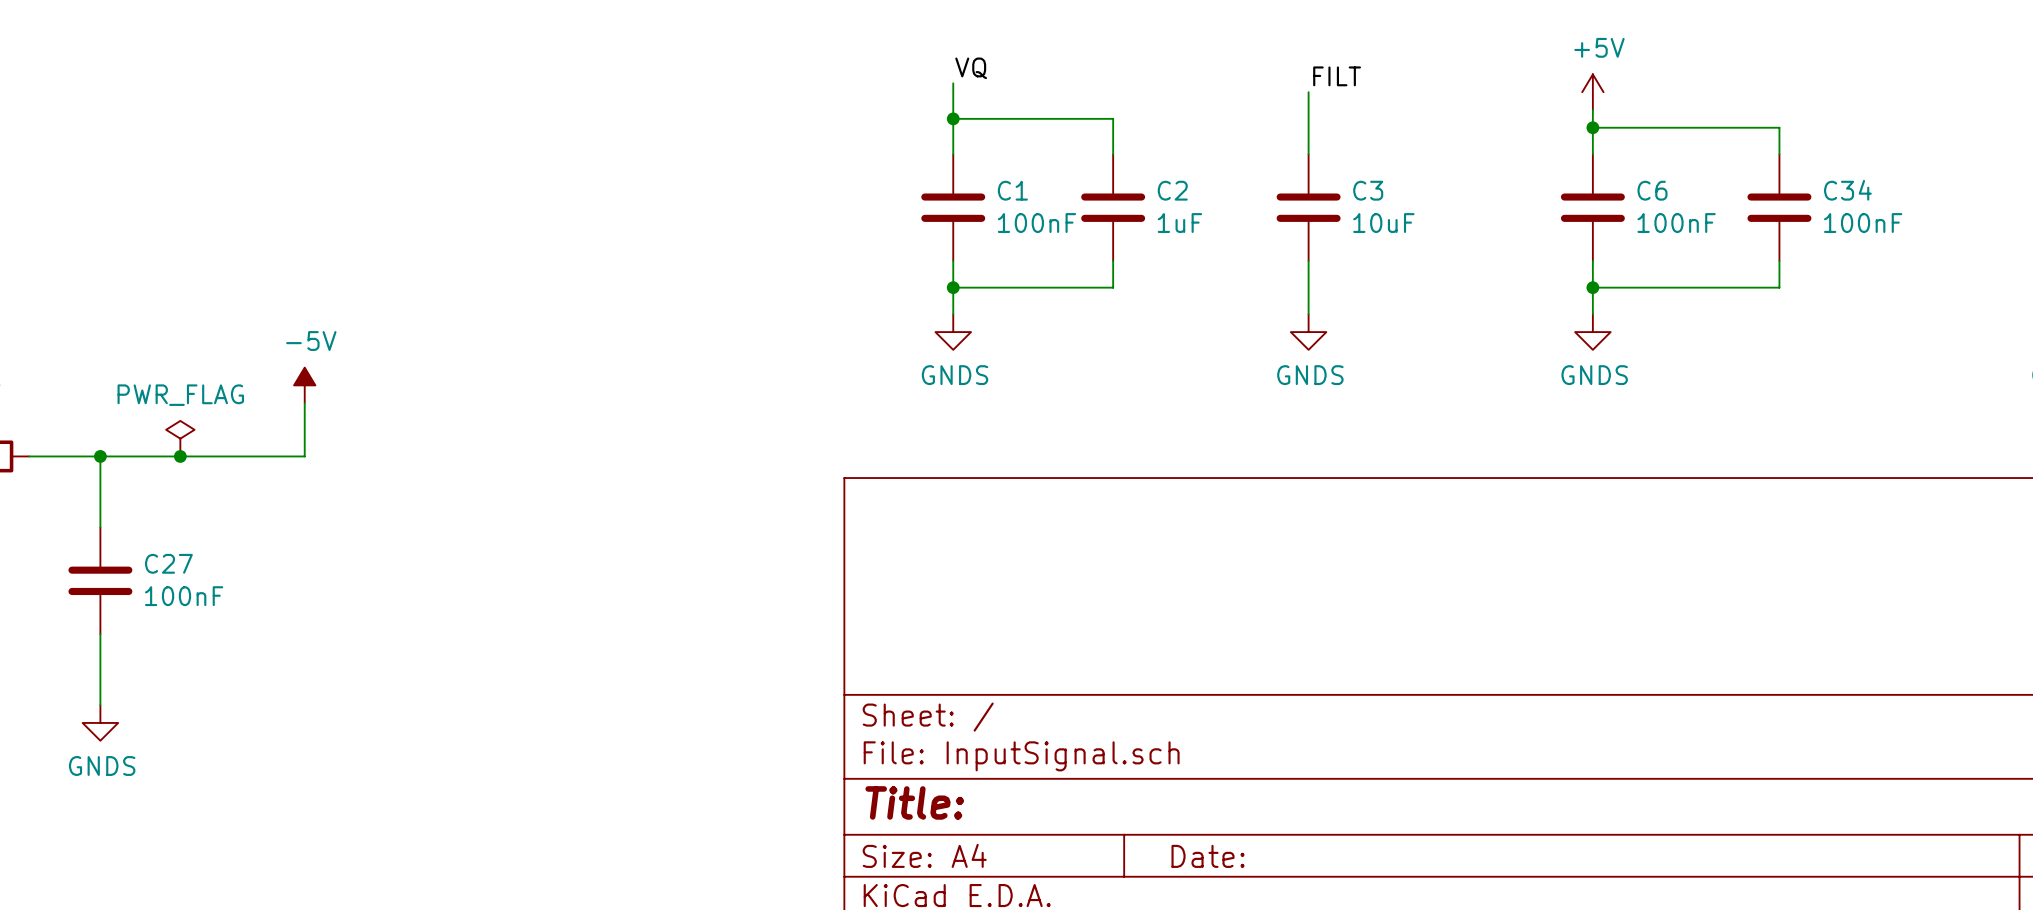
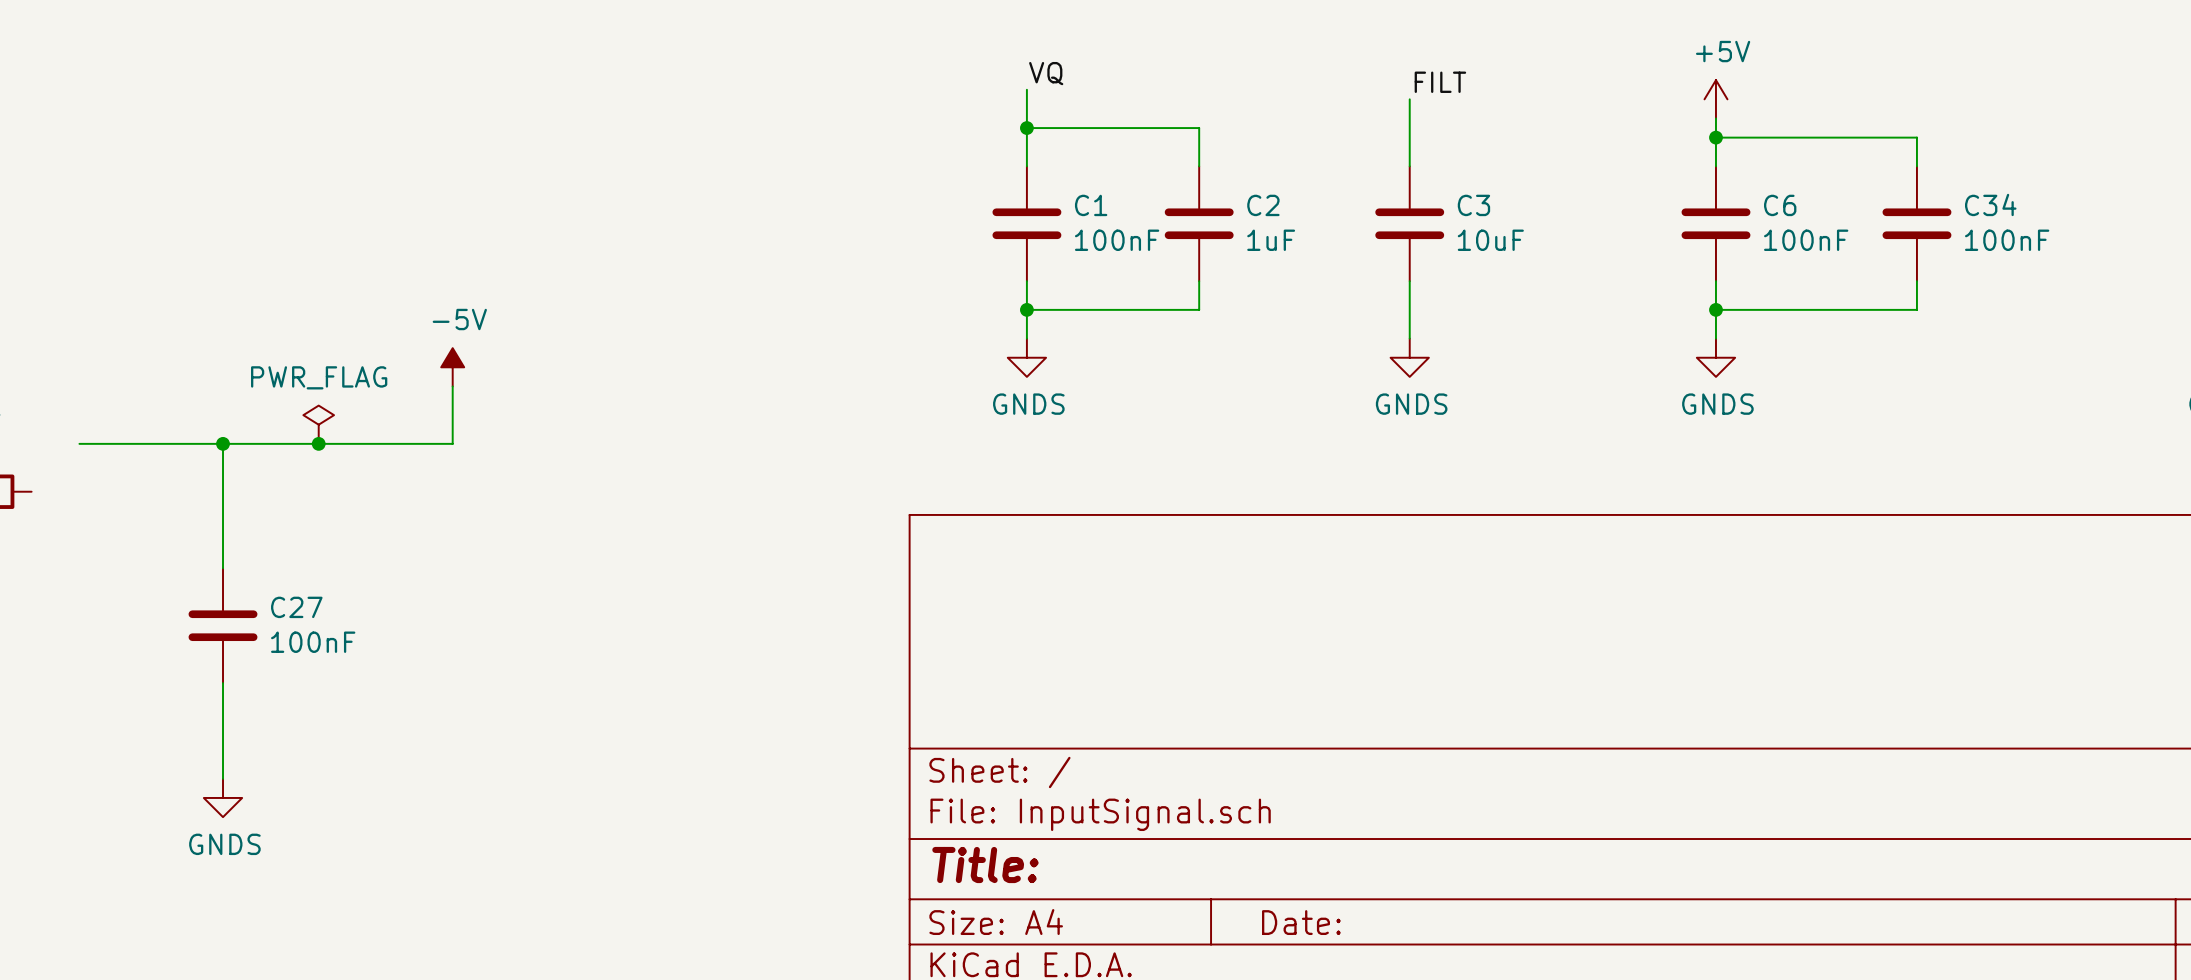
power symbol: none -> -5V (452, 367)
wire: none -> (452, 386) (452, 443) (79, 443)
power symbol: -5V (304, 385) -> PWR_FLAG (318, 424)
wire: (304, 403) (304, 456) (29, 456) -> none
wire: none -> (223, 443) (223, 568)
junction: none -> (318, 443)
power symbol: PWR_FLAG (180, 438) -> none
wire: (100, 456) (100, 527) -> none
junction: (100, 456) -> none
junction position: (180, 456) -> (223, 443)
C27 position: (100, 580) -> (223, 625)
wire: (100, 634) (100, 705) -> none
wire: none -> (223, 683) (223, 778)
power symbol position: GNDS (100, 722) -> GNDS (223, 797)

